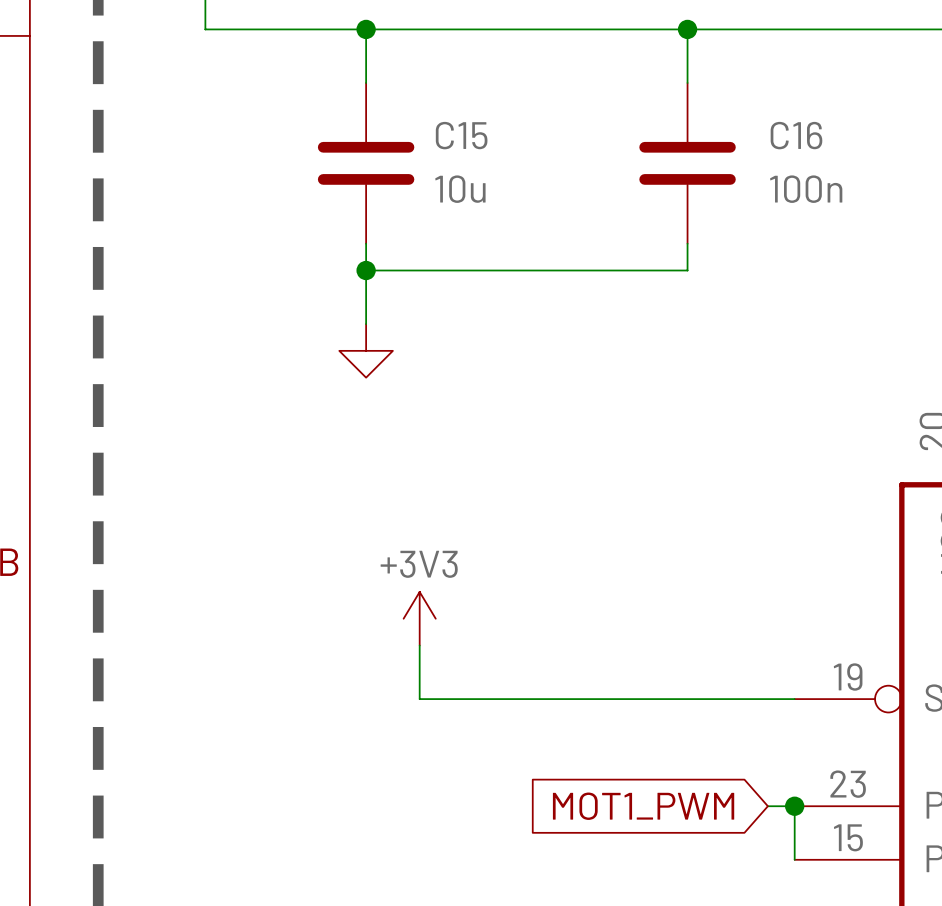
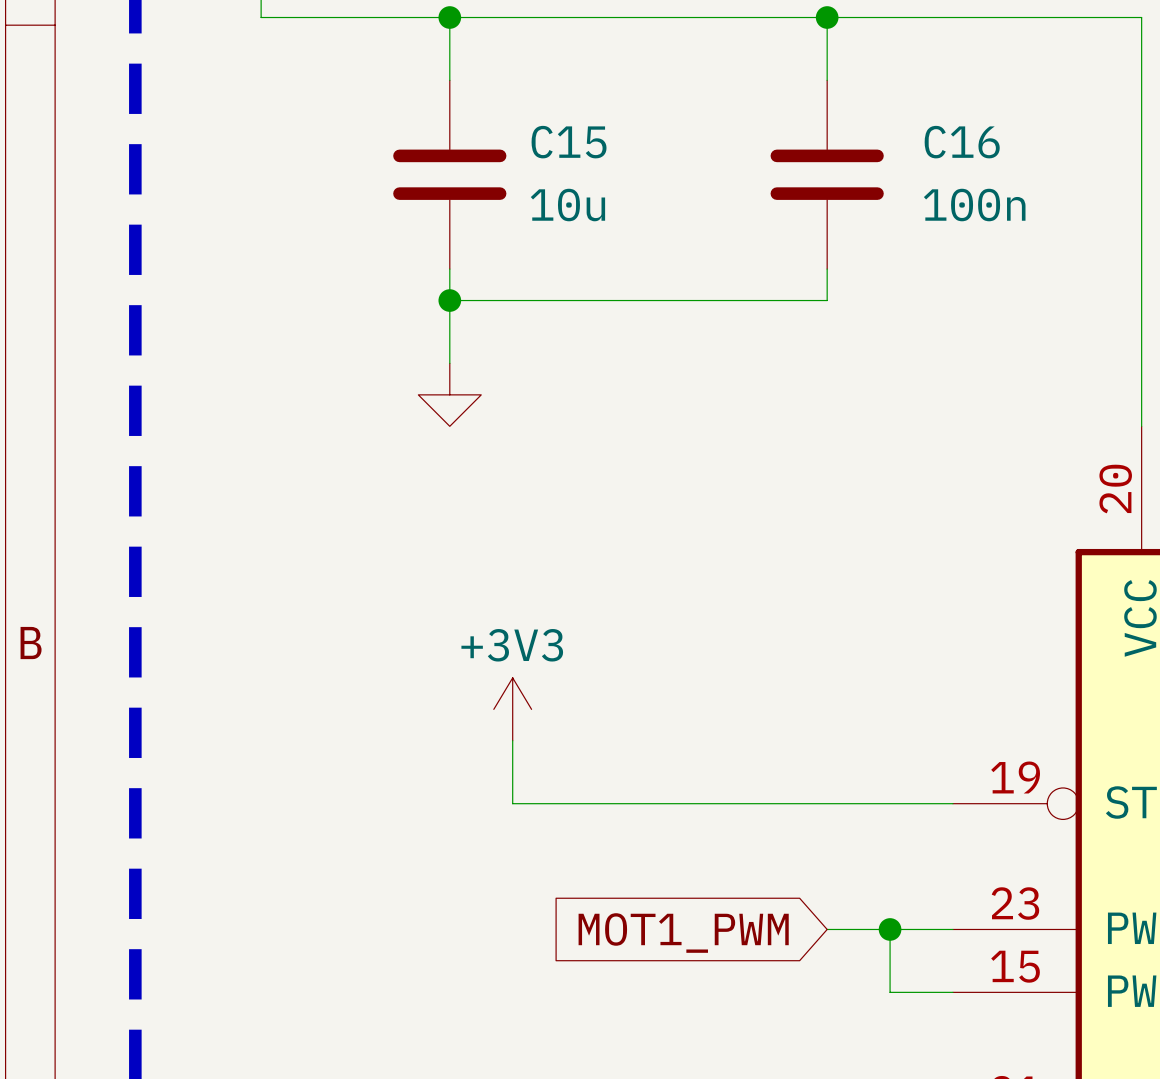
global label position: MOT1_PWM (643, 806) -> MOT1_PWM (683, 933)
wire: none -> (827, 929) (921, 929)
wire: (794, 806) (794, 859) -> (890, 929) (890, 992) (952, 992)
junction position: (794, 806) -> (890, 929)

